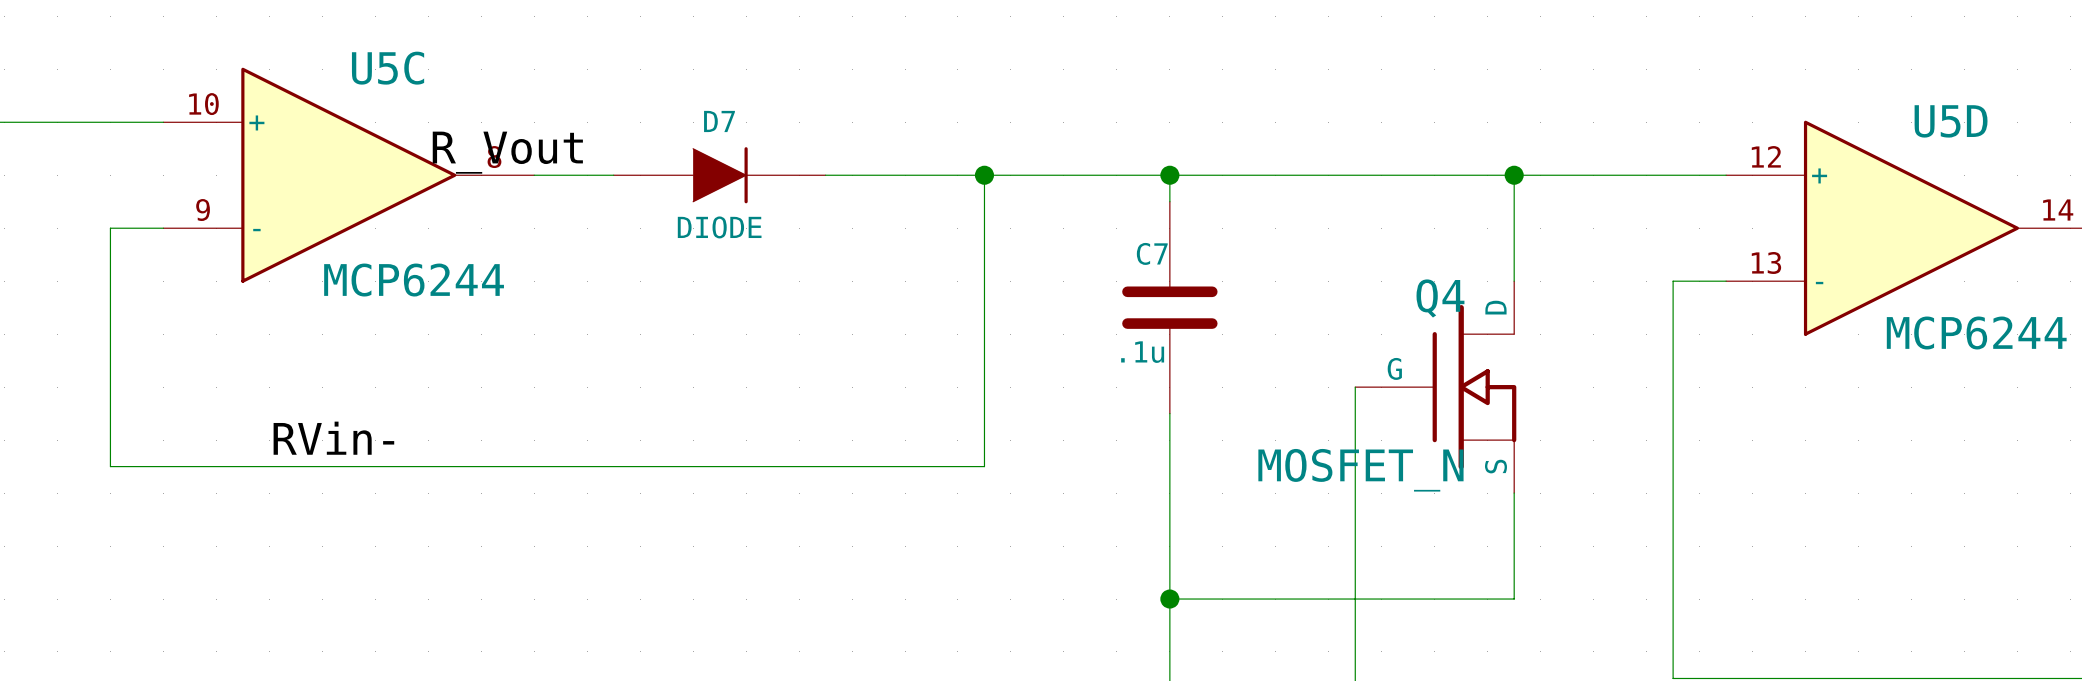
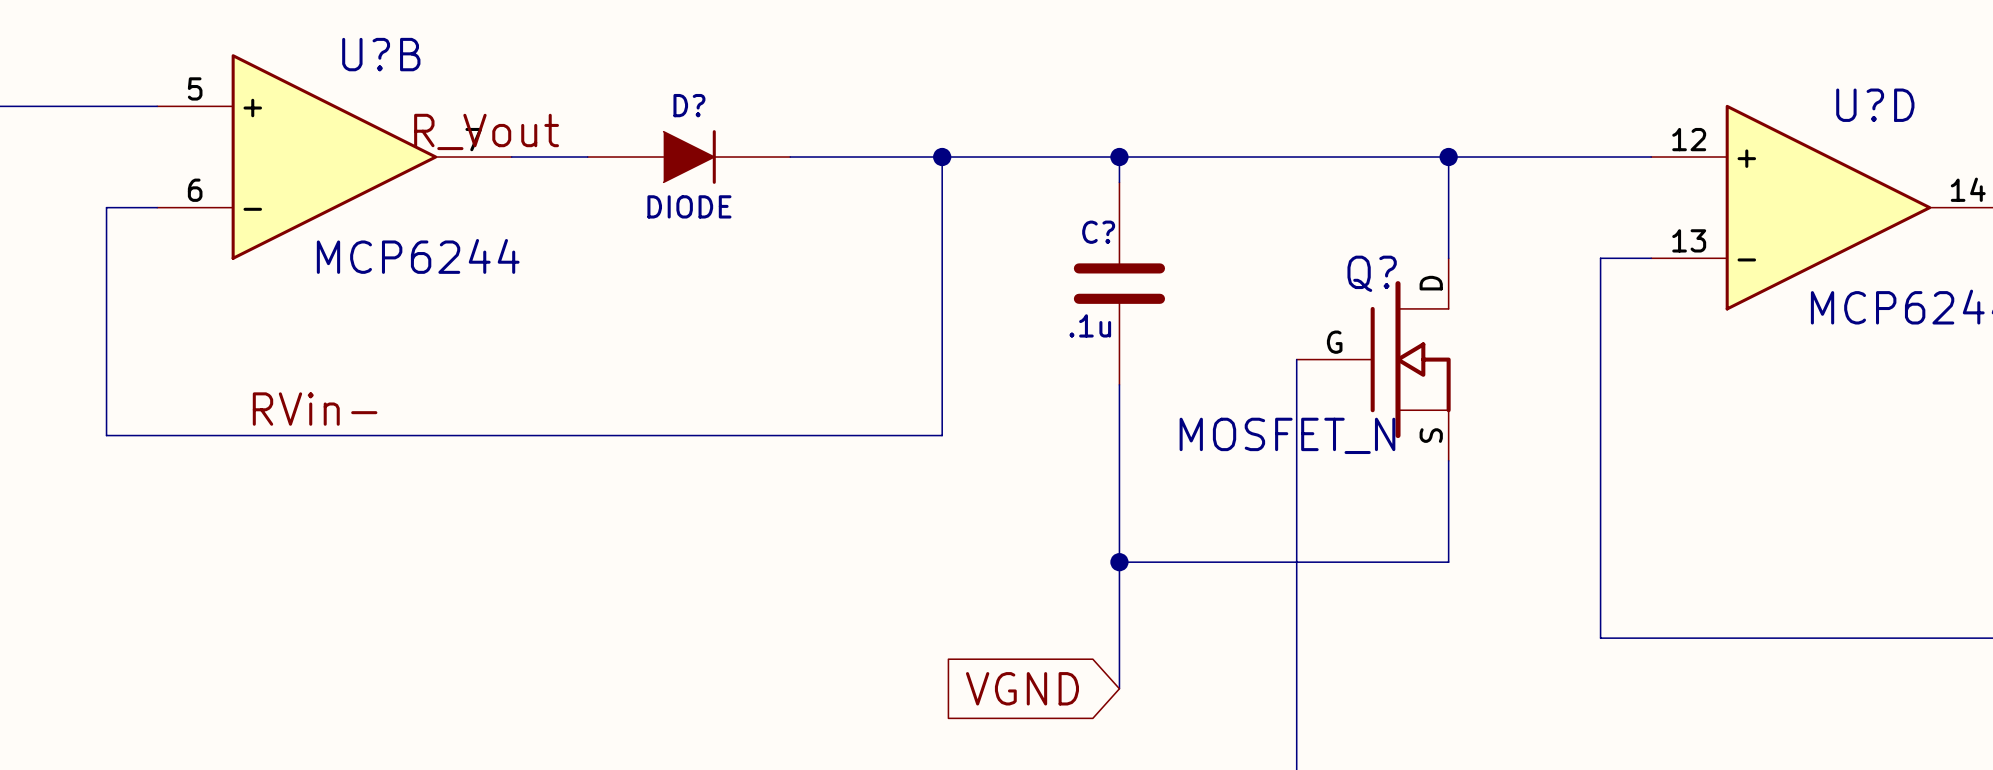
D7 name: D7 (719, 121) -> D? (689, 105)
U5D name: U5D (1951, 121) -> U?D (1875, 105)
U5C: MCP6244 (348, 175) -> none
U?B: none -> MCP6244 (334, 157)
C7 name: C7 (1152, 253) -> C? (1098, 232)
Q4 name: Q4 (1440, 298) -> Q? (1372, 273)

